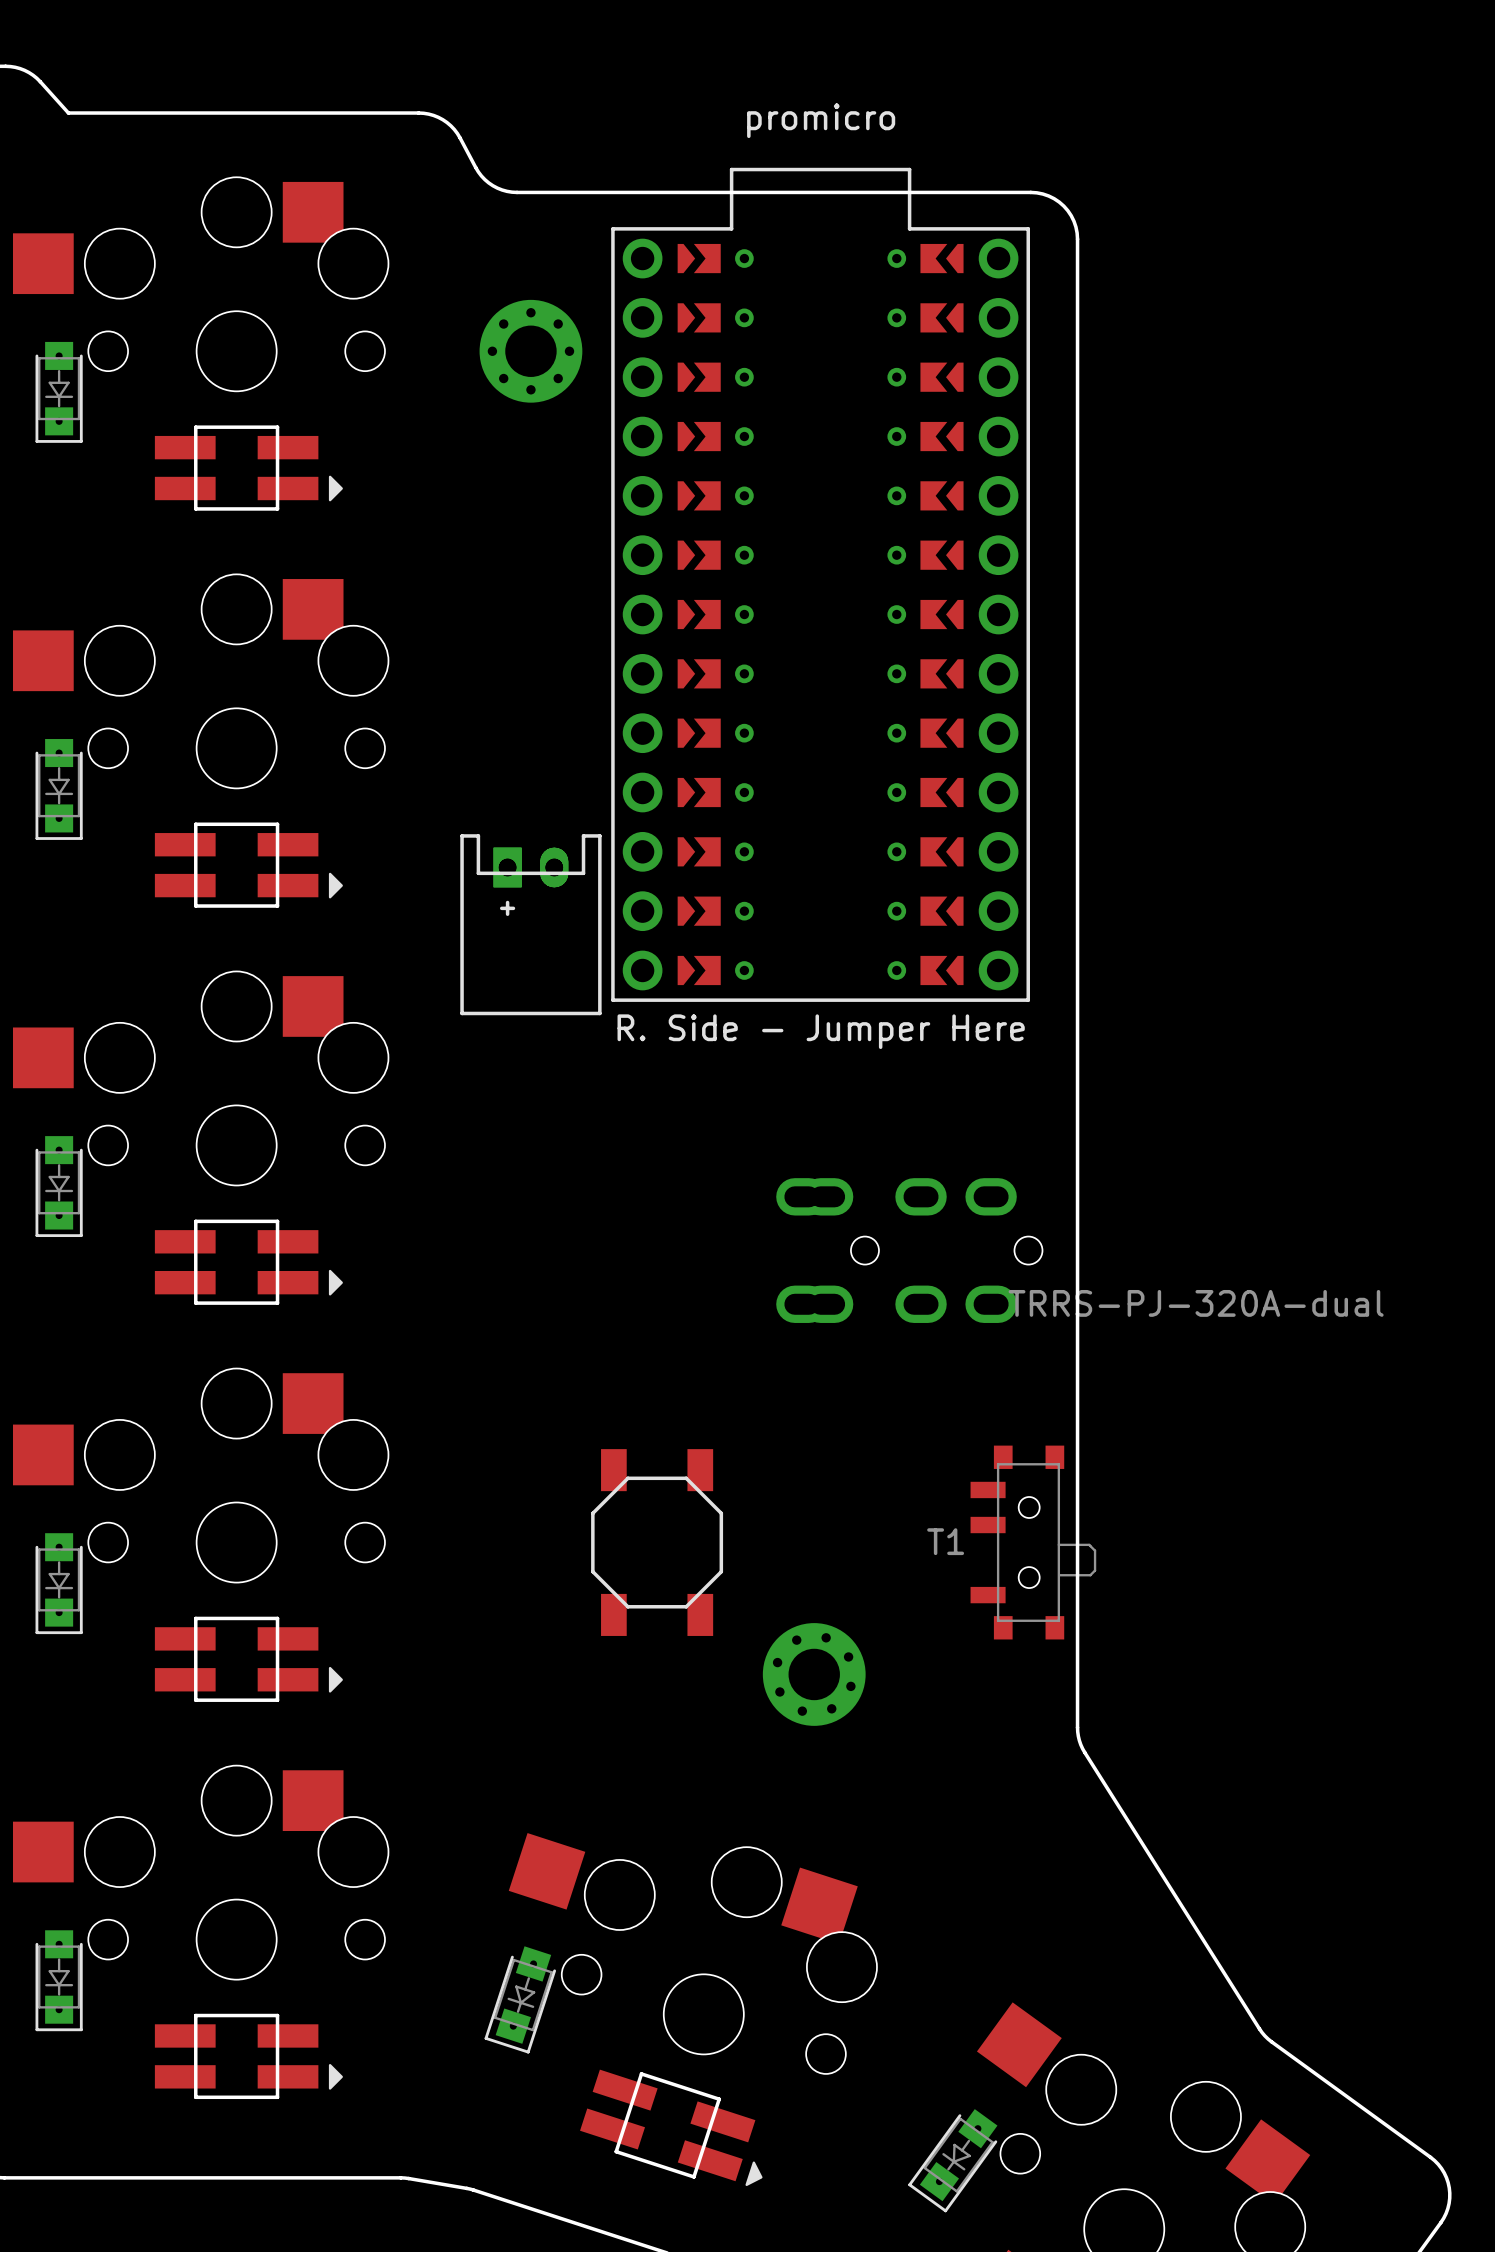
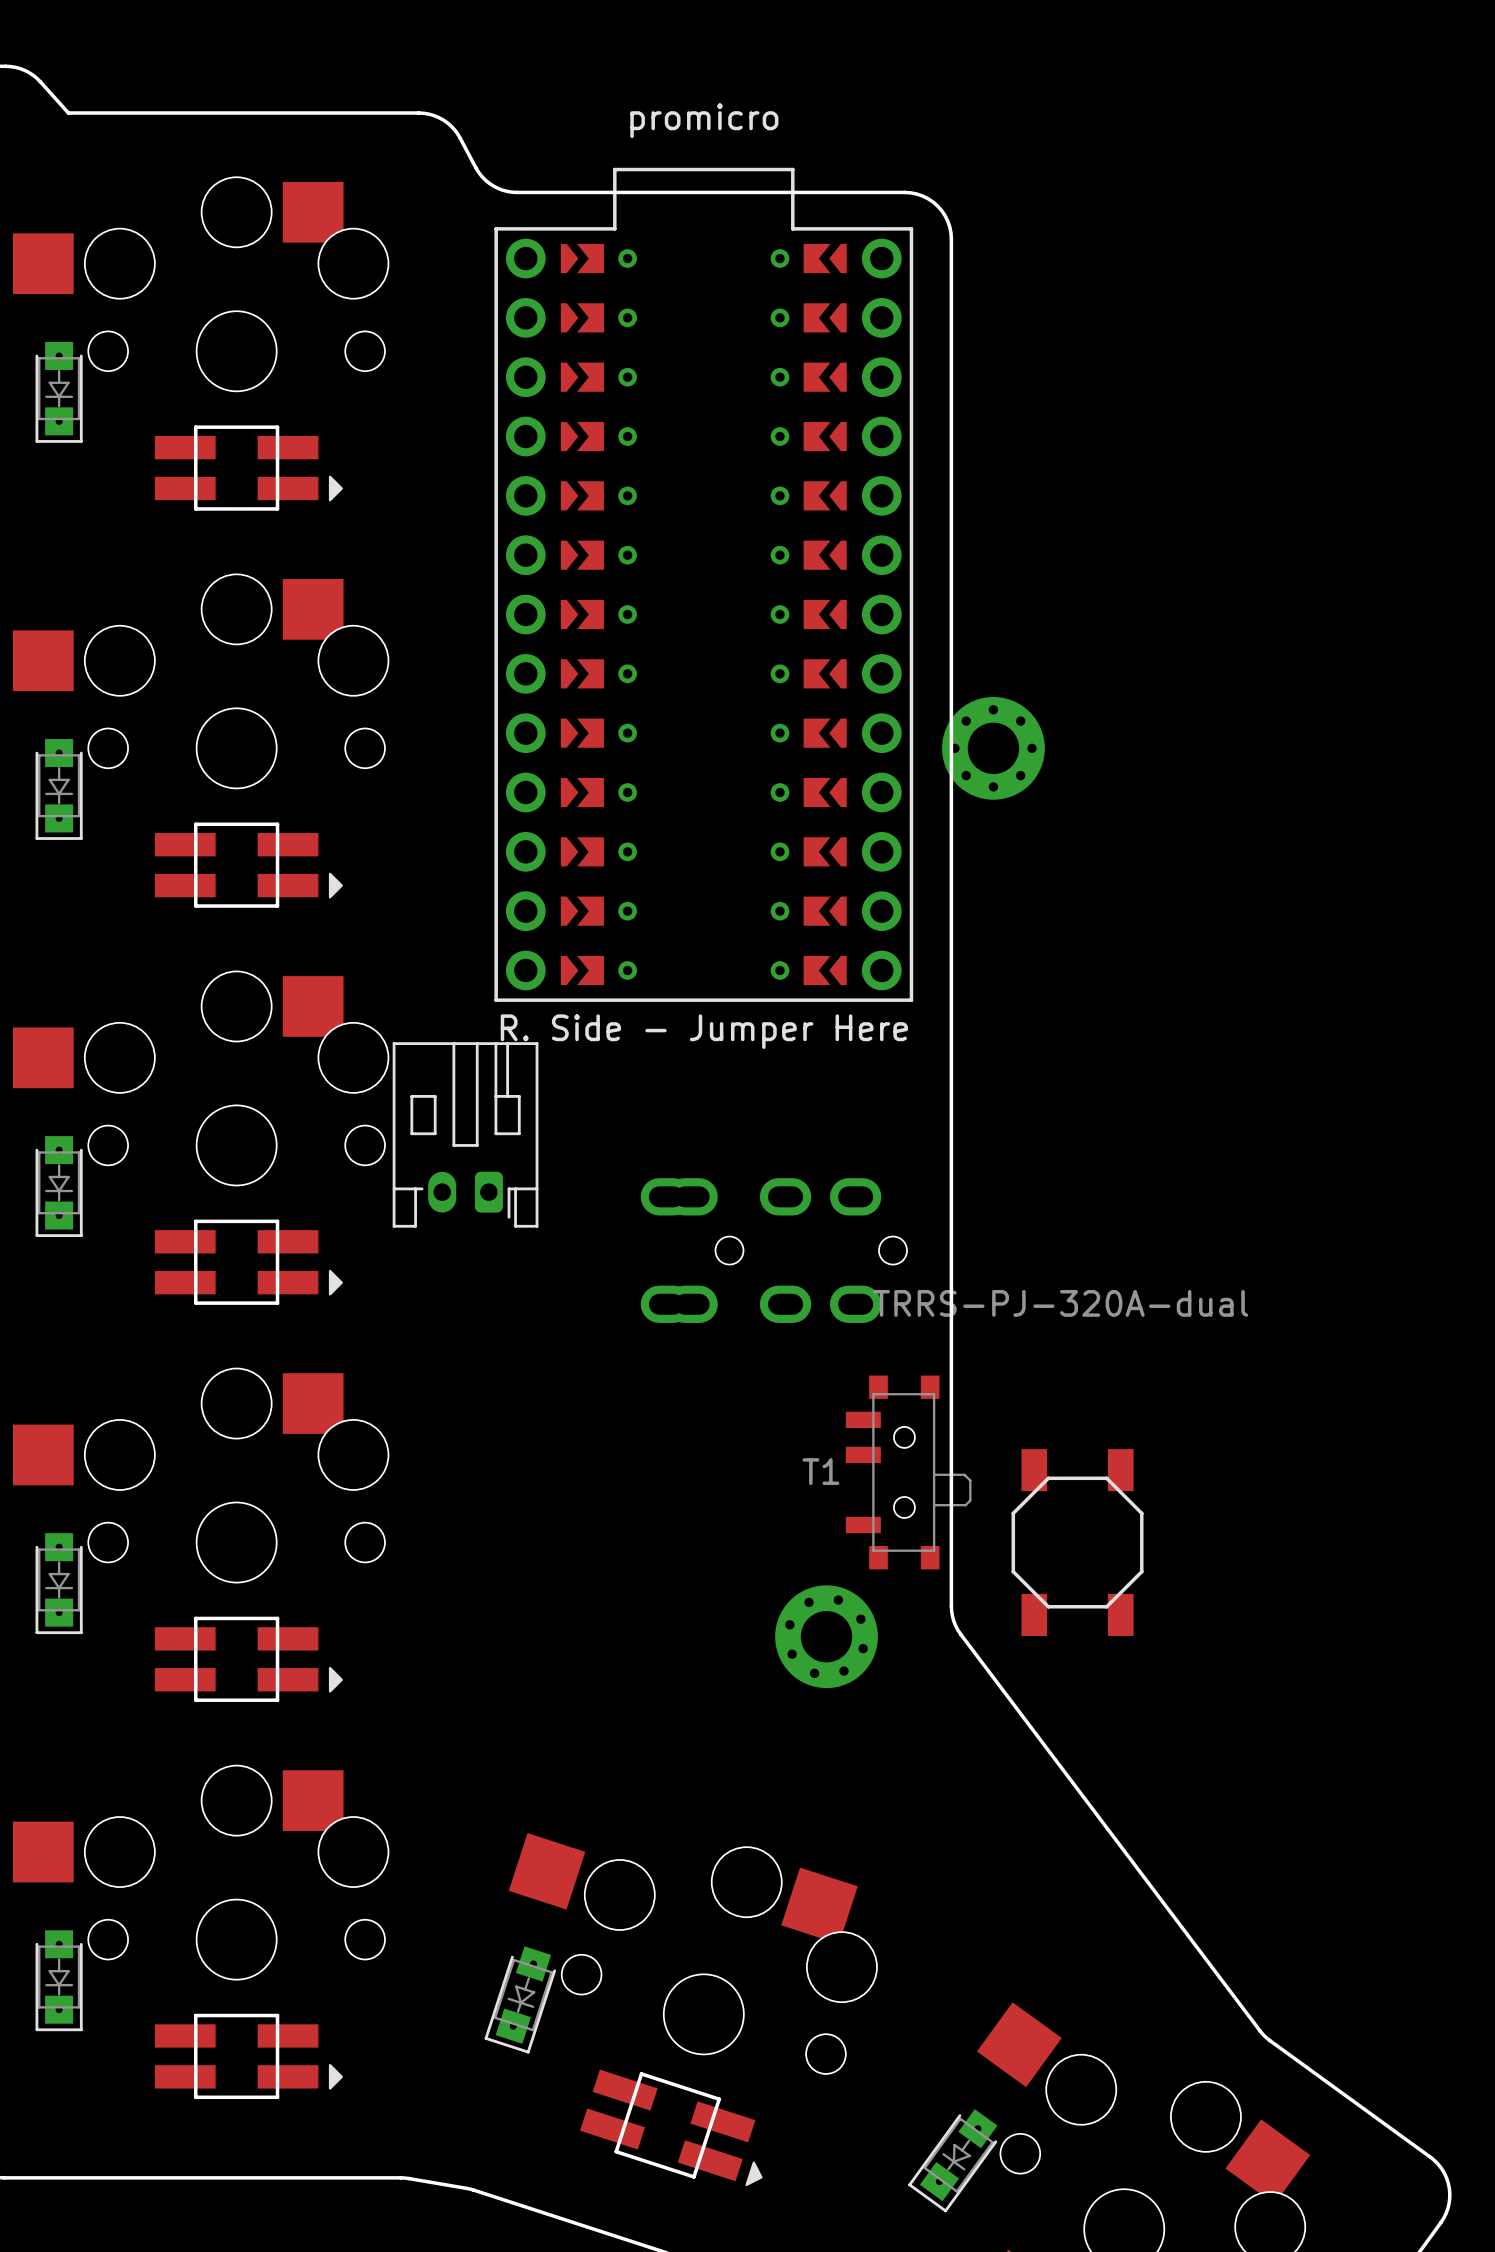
board edge: (904, 192) (1042, 194) (1054, 198) (1063, 206) (1073, 221) (1077, 233) (1077, 1731) (1084, 1752) (1259, 2028) (1271, 2041) -> (904, 192) (922, 195) (937, 206) (947, 221) (951, 239) (952, 1616) (960, 1634) (1260, 2030) (1271, 2041)
part: (530, 351) -> none
part position: (820, 584) -> (703, 584)
part: none -> (993, 748)
part: (530, 867) -> none
part: (530, 924) -> none
part: none -> (465, 1134)
part position: (909, 1250) -> (773, 1250)
part position: (657, 1542) -> (1077, 1542)
T1 position: (1033, 1542) -> (908, 1472)
part position: (814, 1674) -> (826, 1636)

